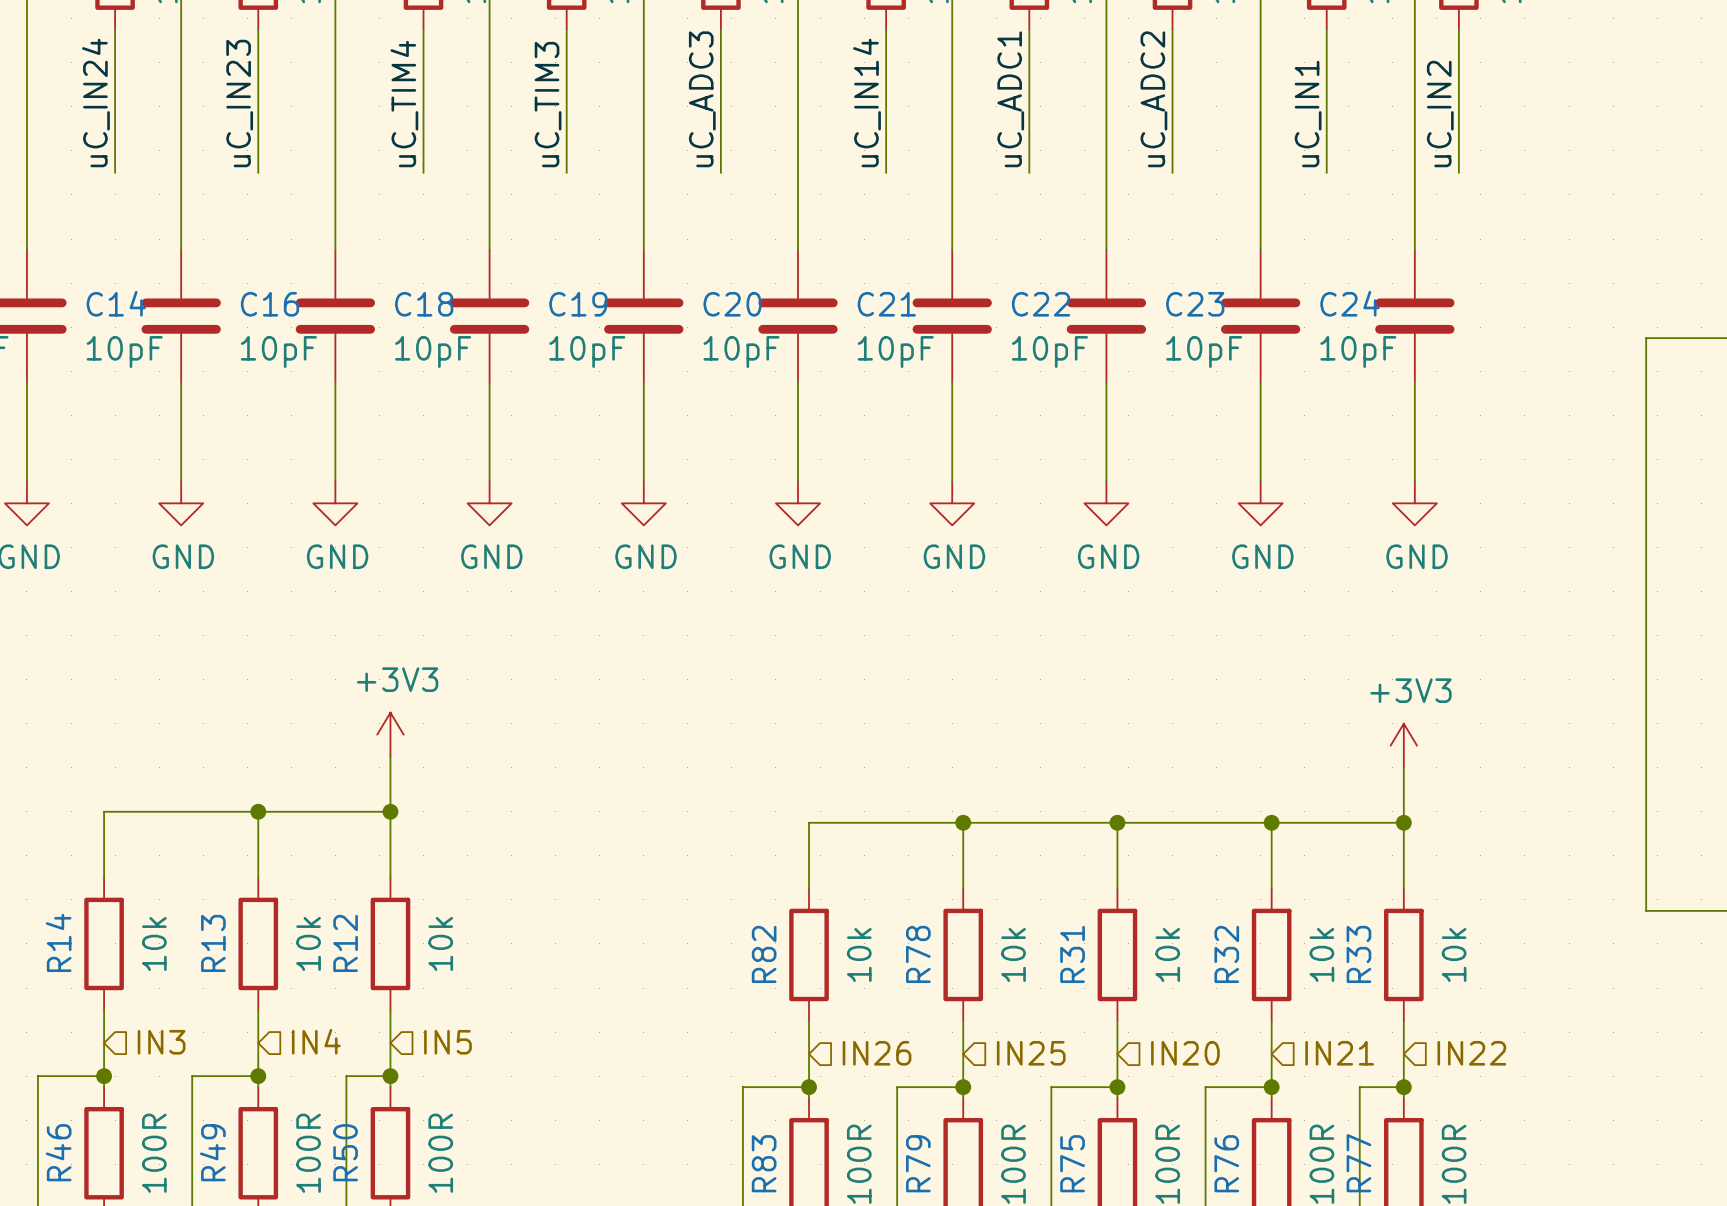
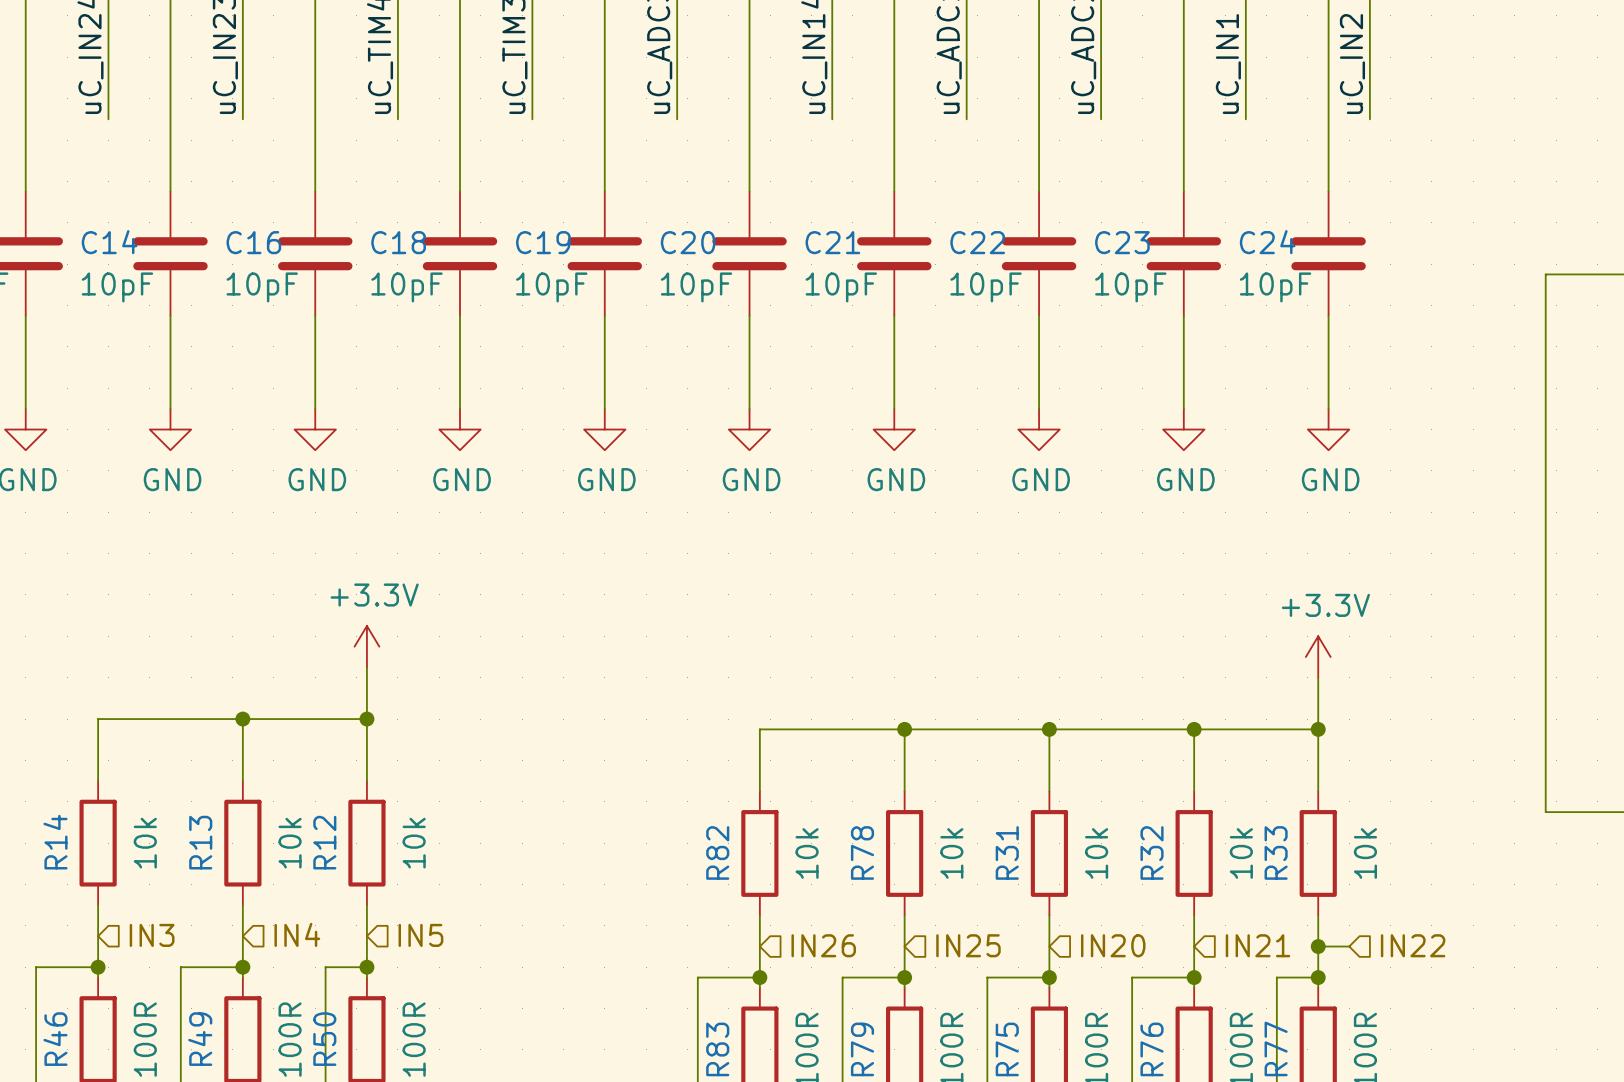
power symbol: +3V3 (390, 734) -> +3.3V (366, 646)
power symbol: +3V3 (1403, 745) -> +3.3V (1318, 657)
hierarchical label position: IN22 (1471, 1053) -> IN22 (1413, 945)
wire: none -> (1318, 946) (1349, 946)
junction: none -> (1318, 946)

